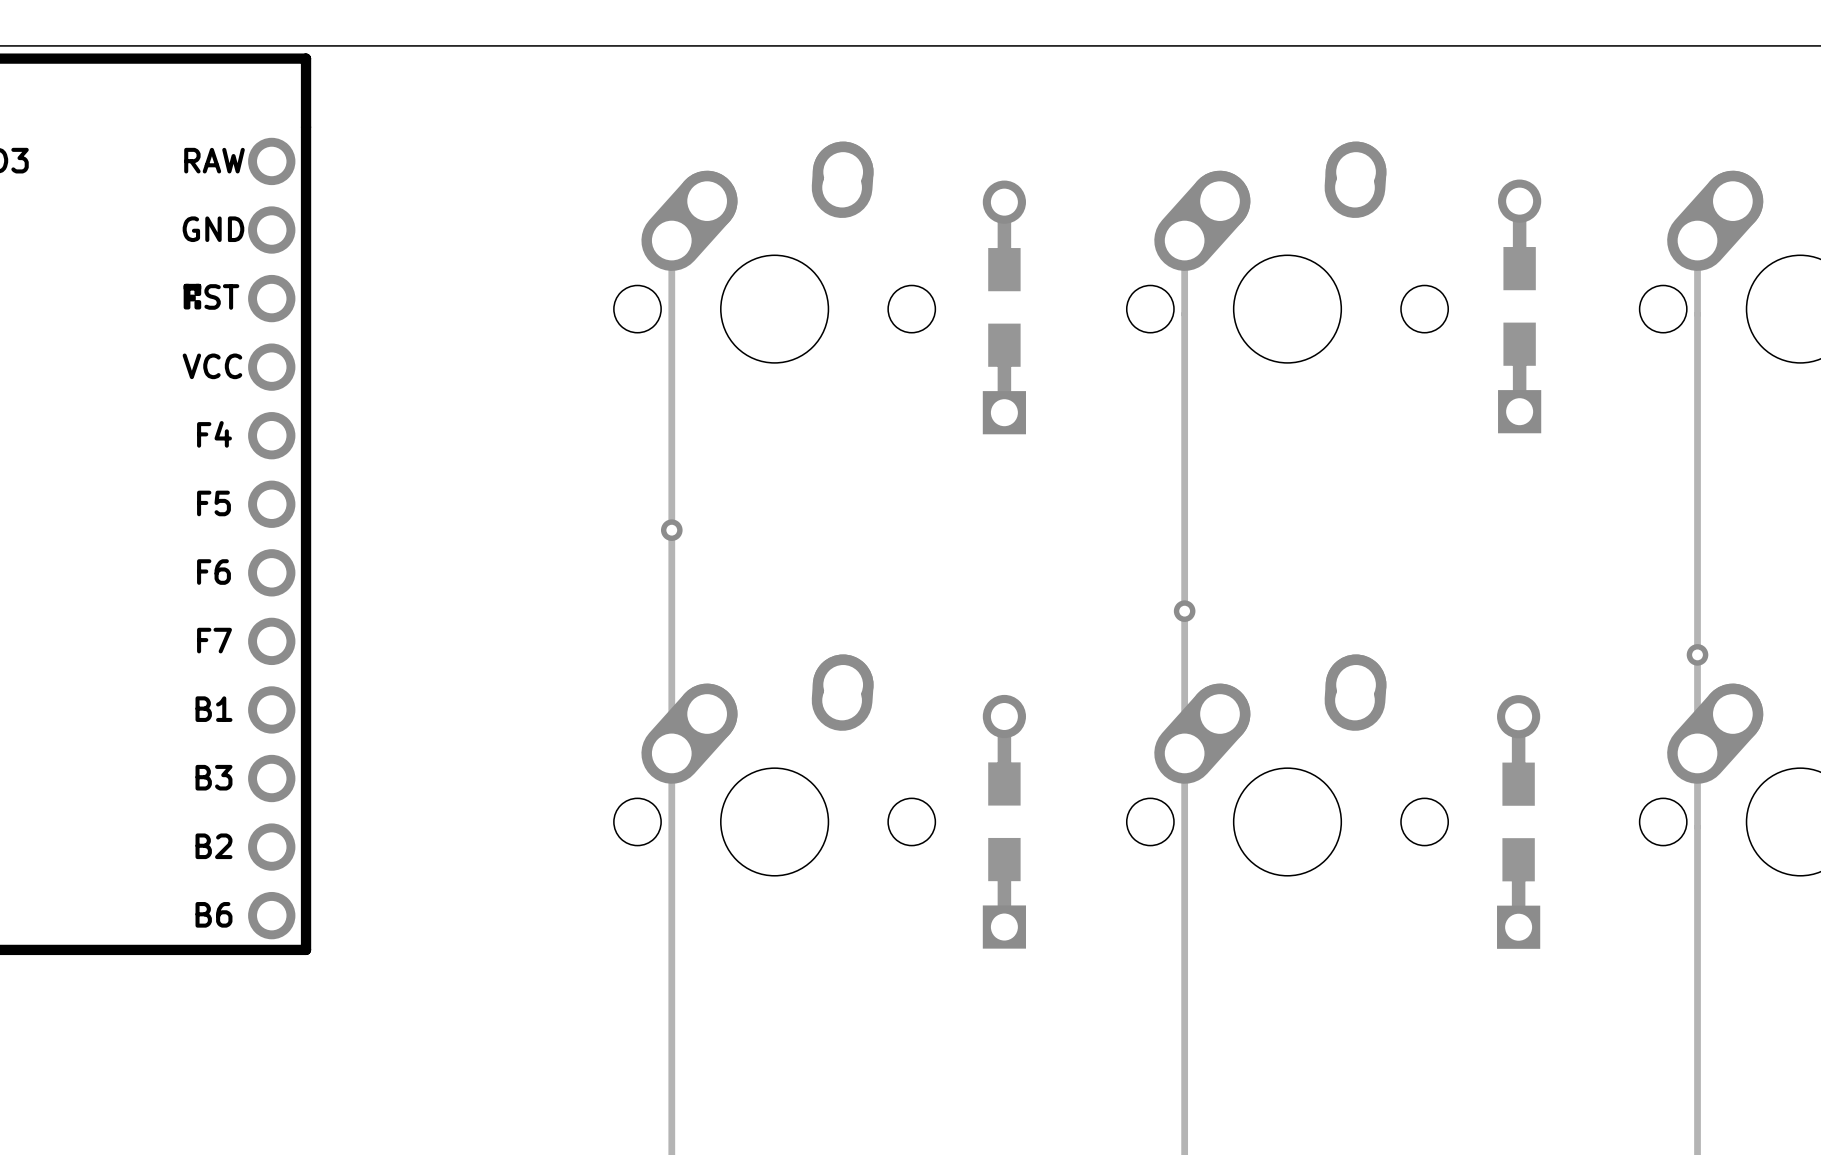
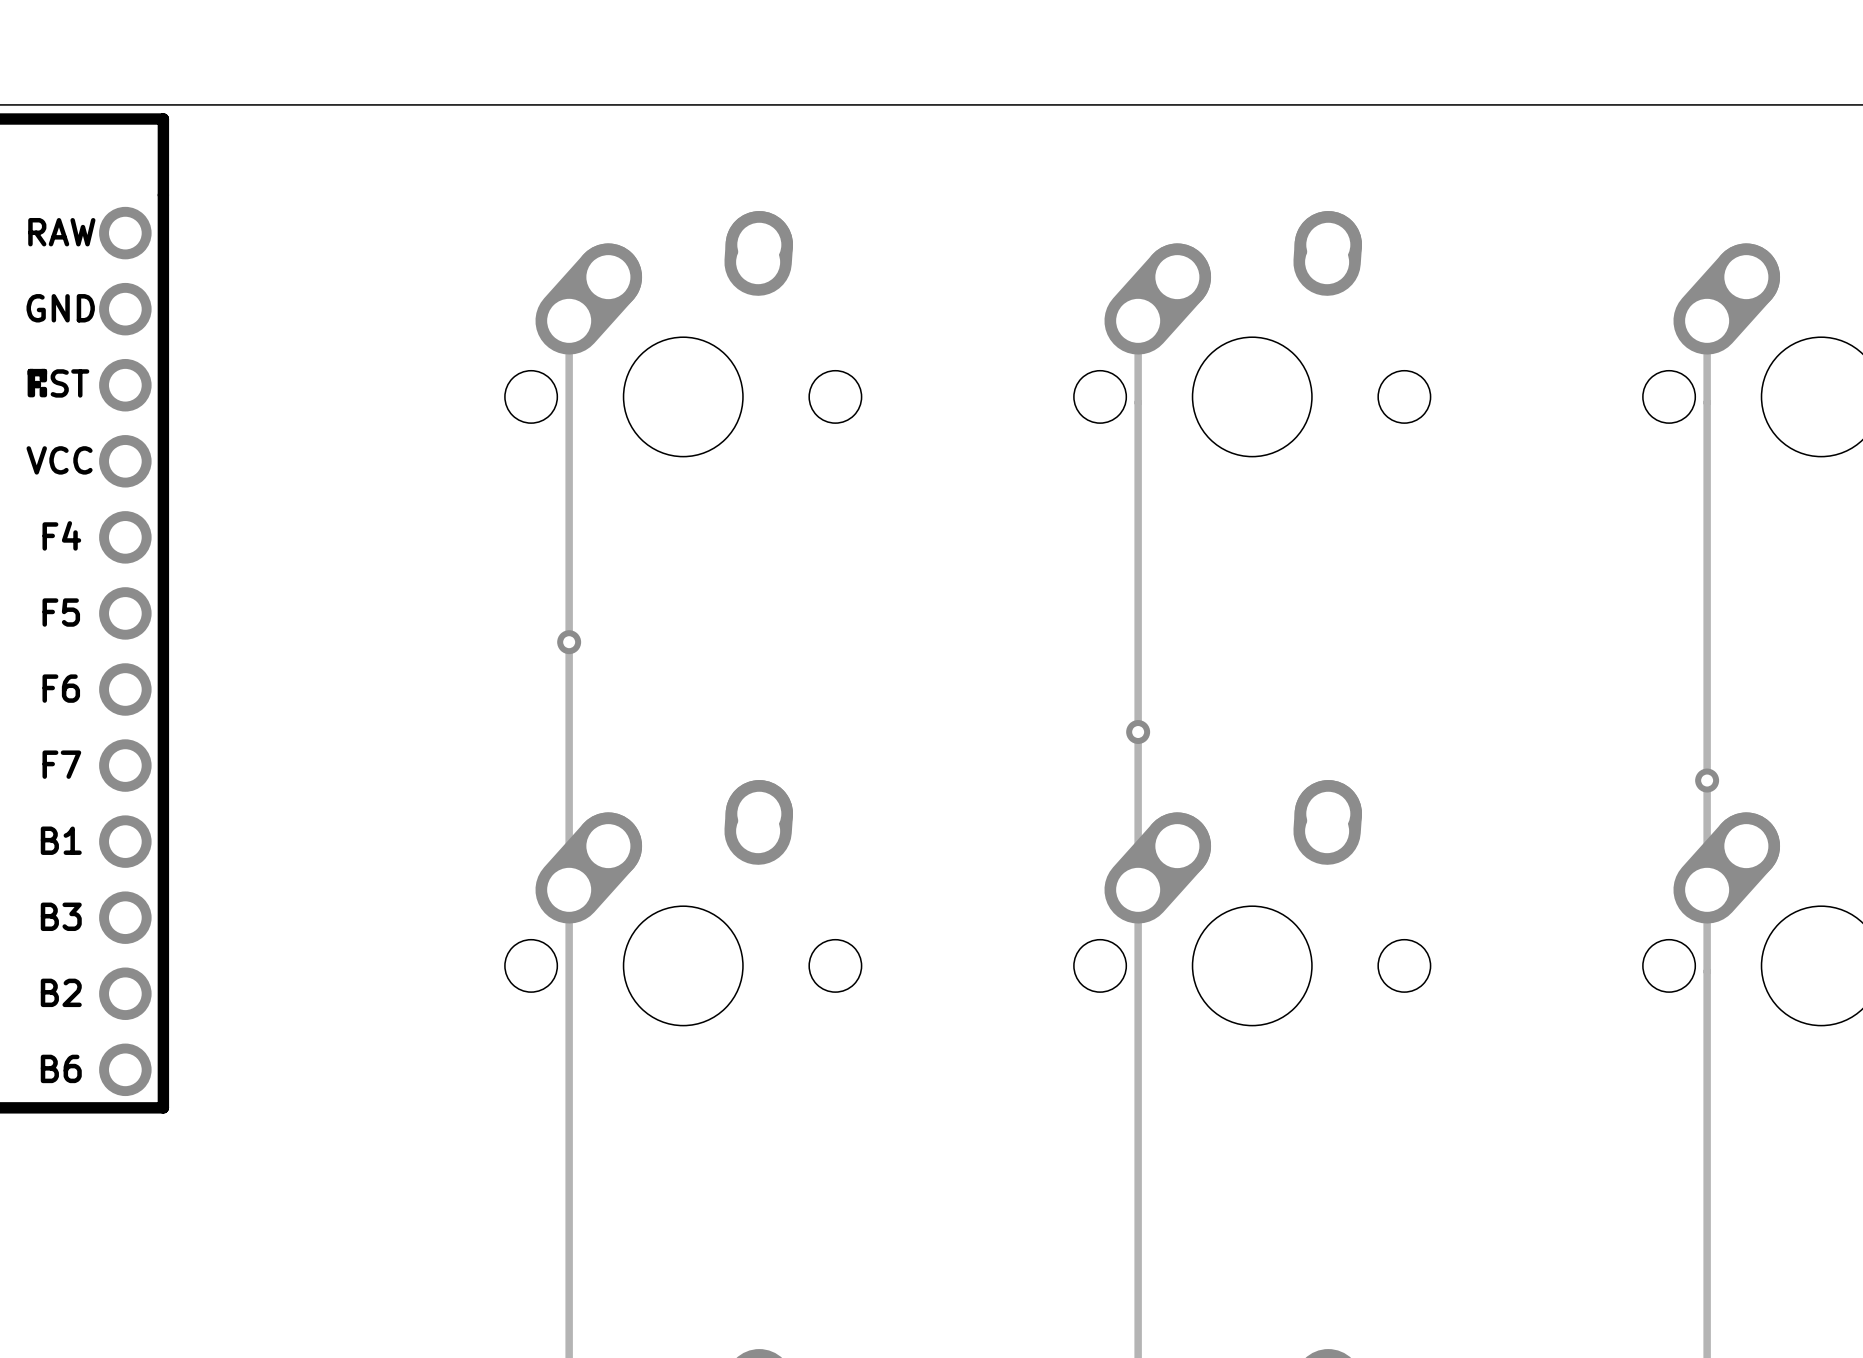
part: (1519, 306) -> none
part: (1004, 307) -> none
part: (1004, 821) -> none
part: (1518, 821) -> none

